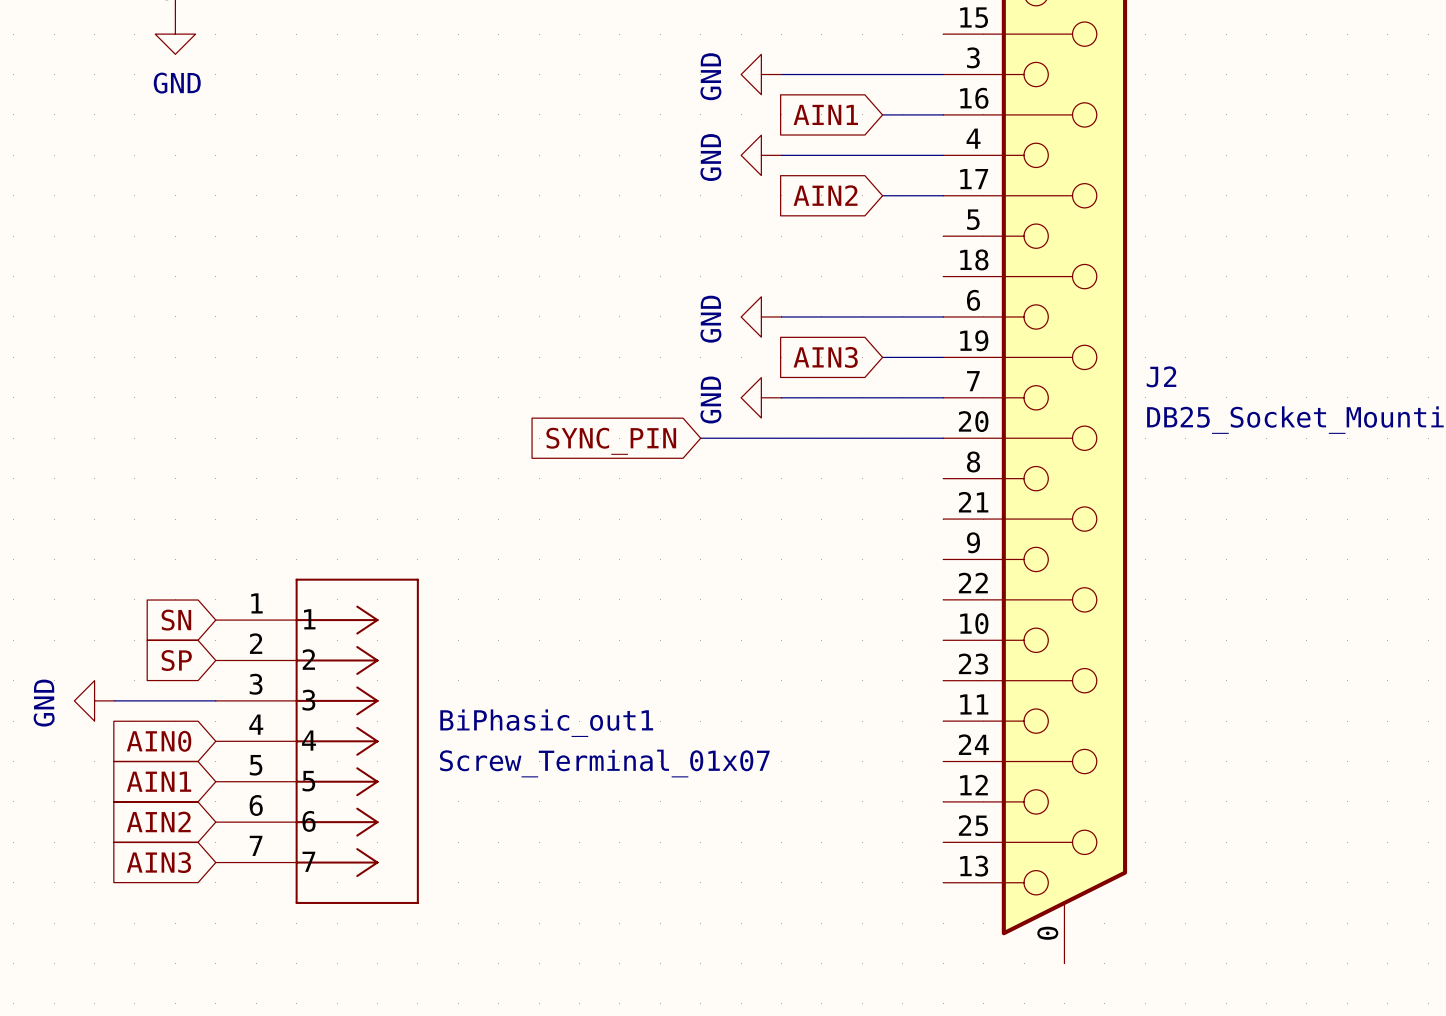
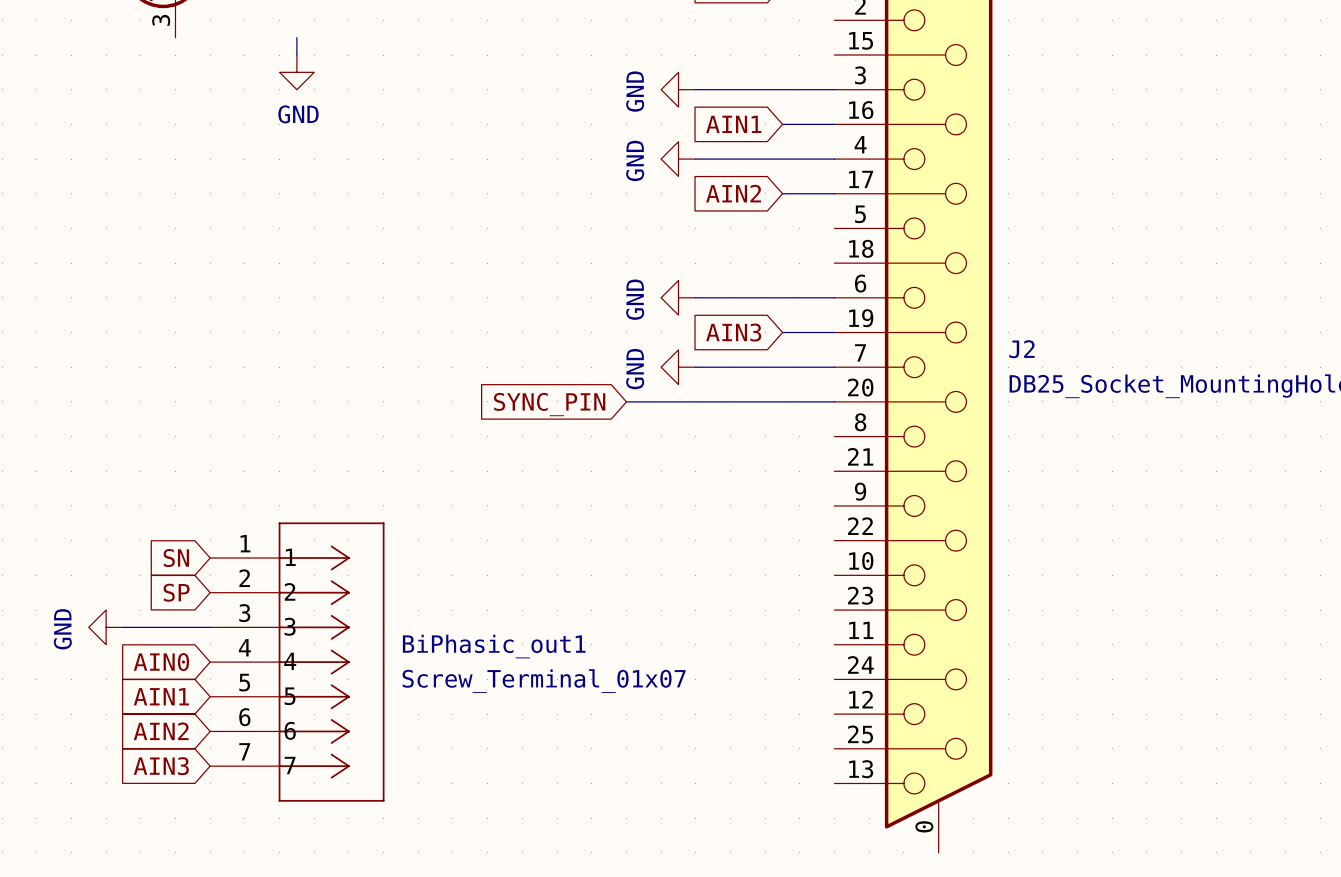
wire: none -> (296, 37) (296, 55)
power symbol: GND (175, 34) -> none
power symbol: none -> GND (296, 72)

